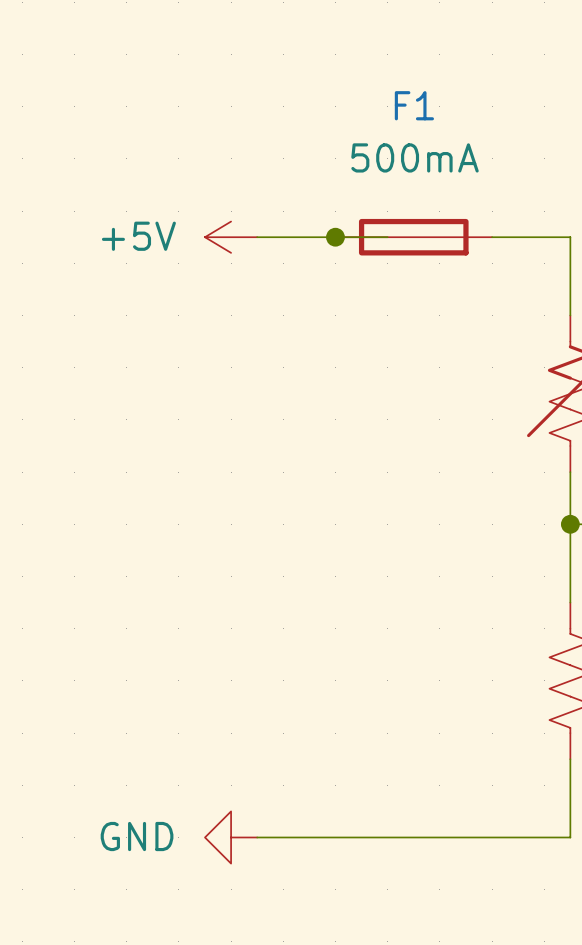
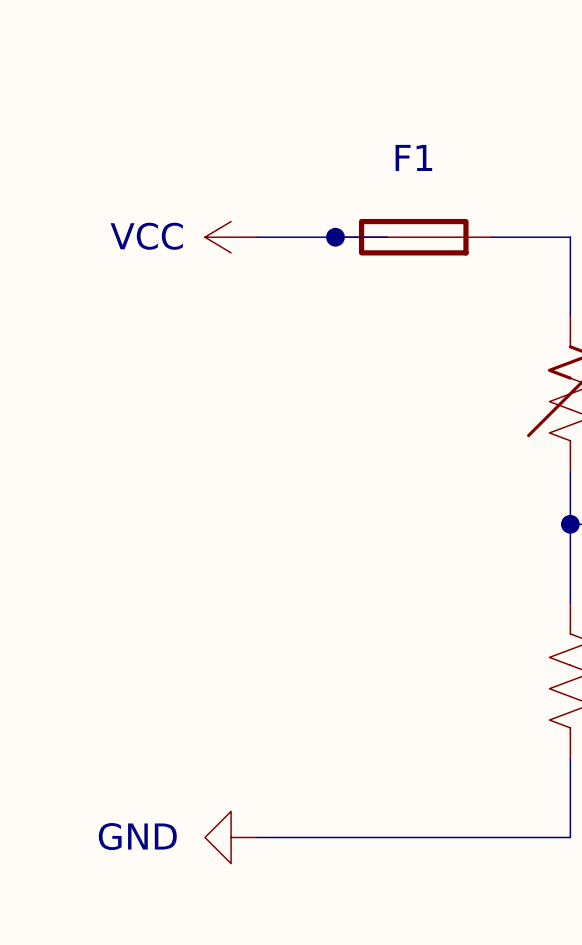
F1 name position: F1 (414, 105) -> F1 (413, 157)
F1 value: 500mA (415, 157) -> none
VCC text: +5V (138, 236) -> none
VCC name: none -> VCC (146, 236)

